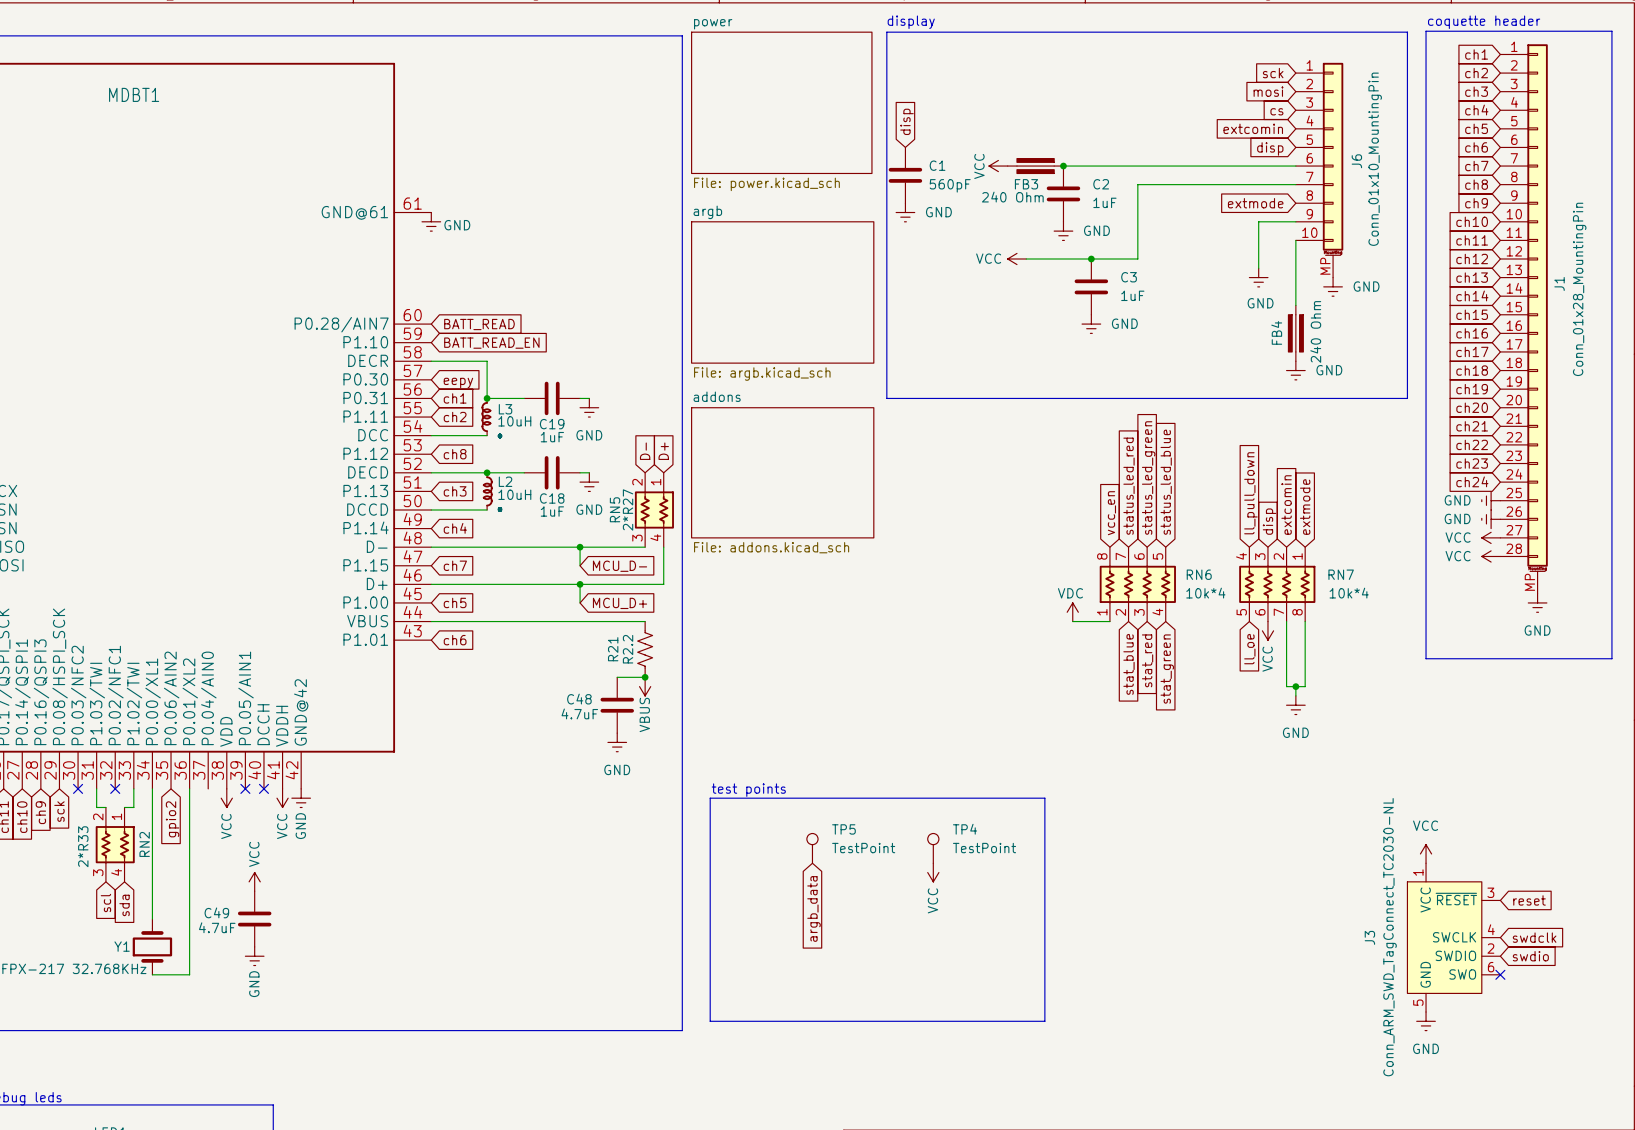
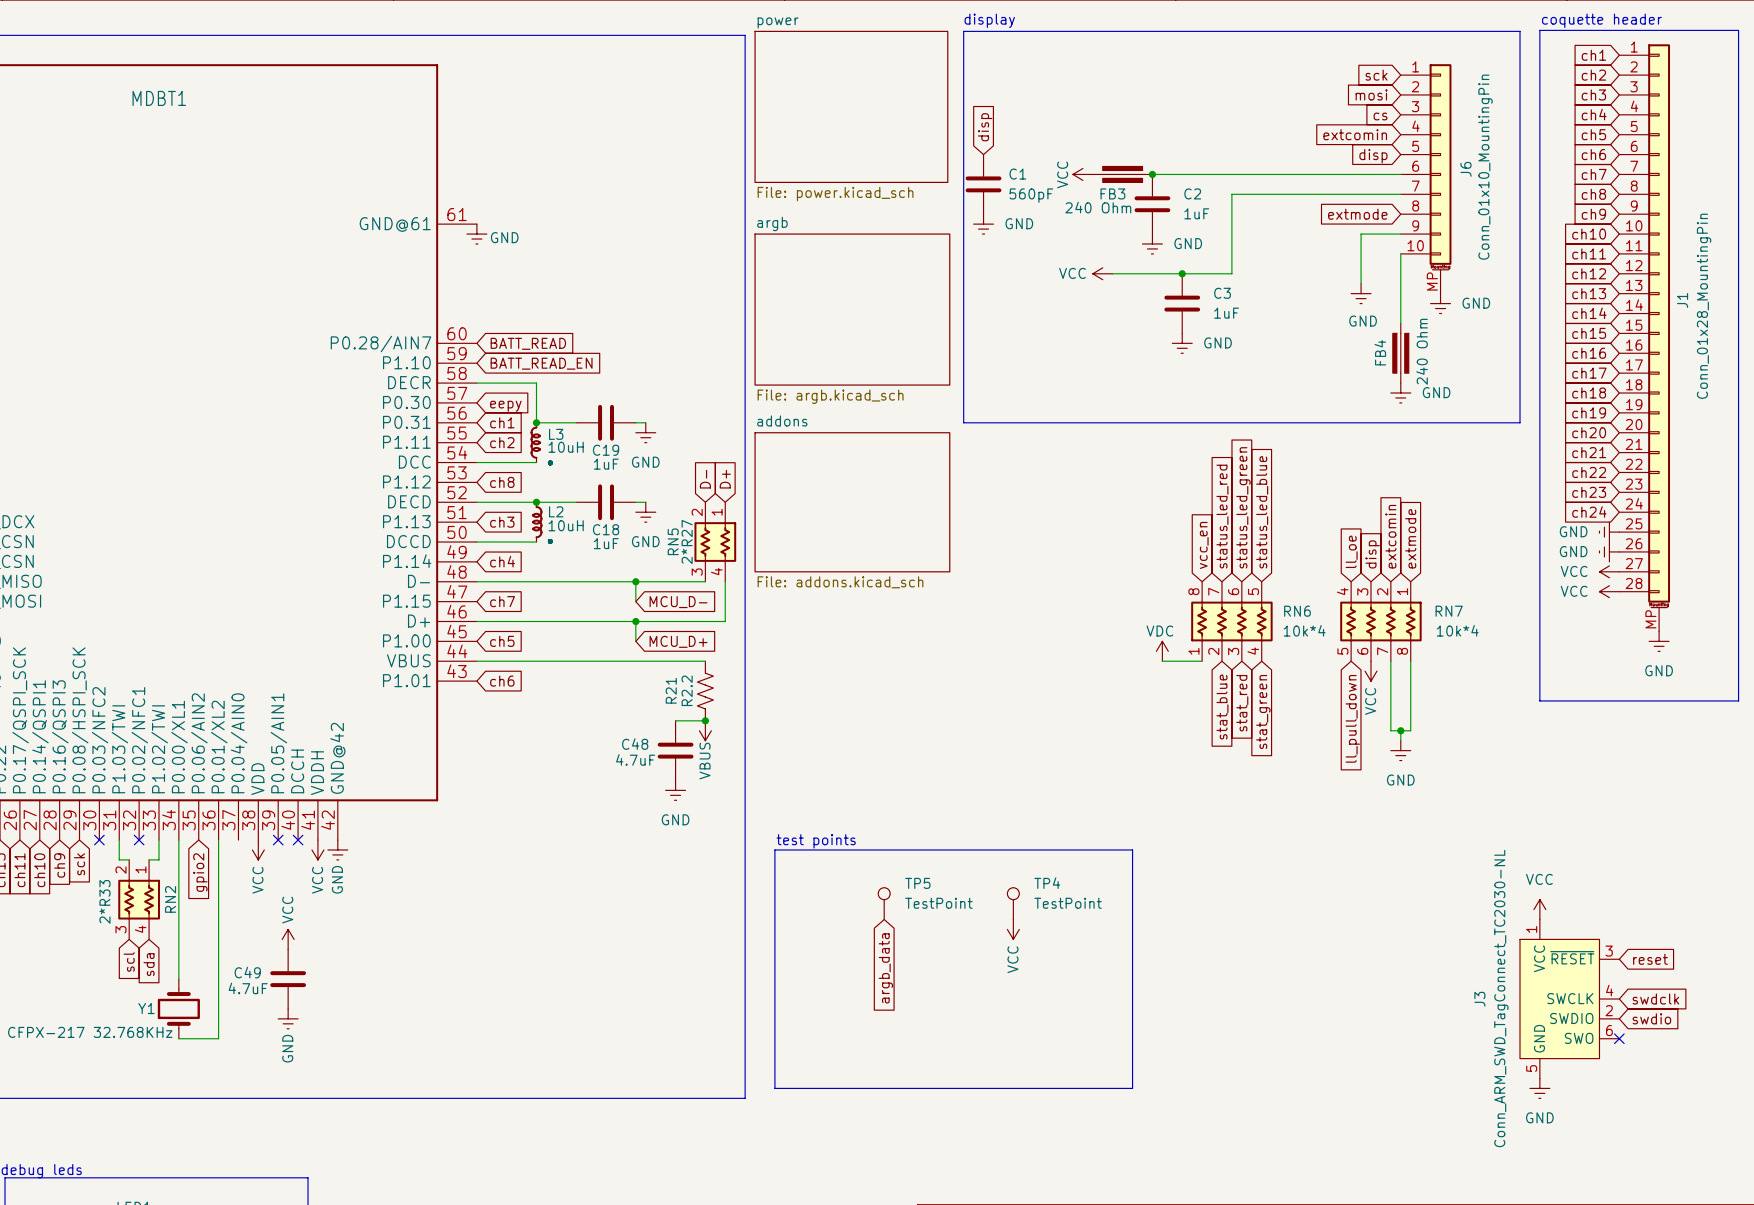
global label: ll_pull_down (1250, 493) -> ll_oe (1351, 551)
global label: ll_oe (1249, 649) -> ll_pull_down (1352, 718)

